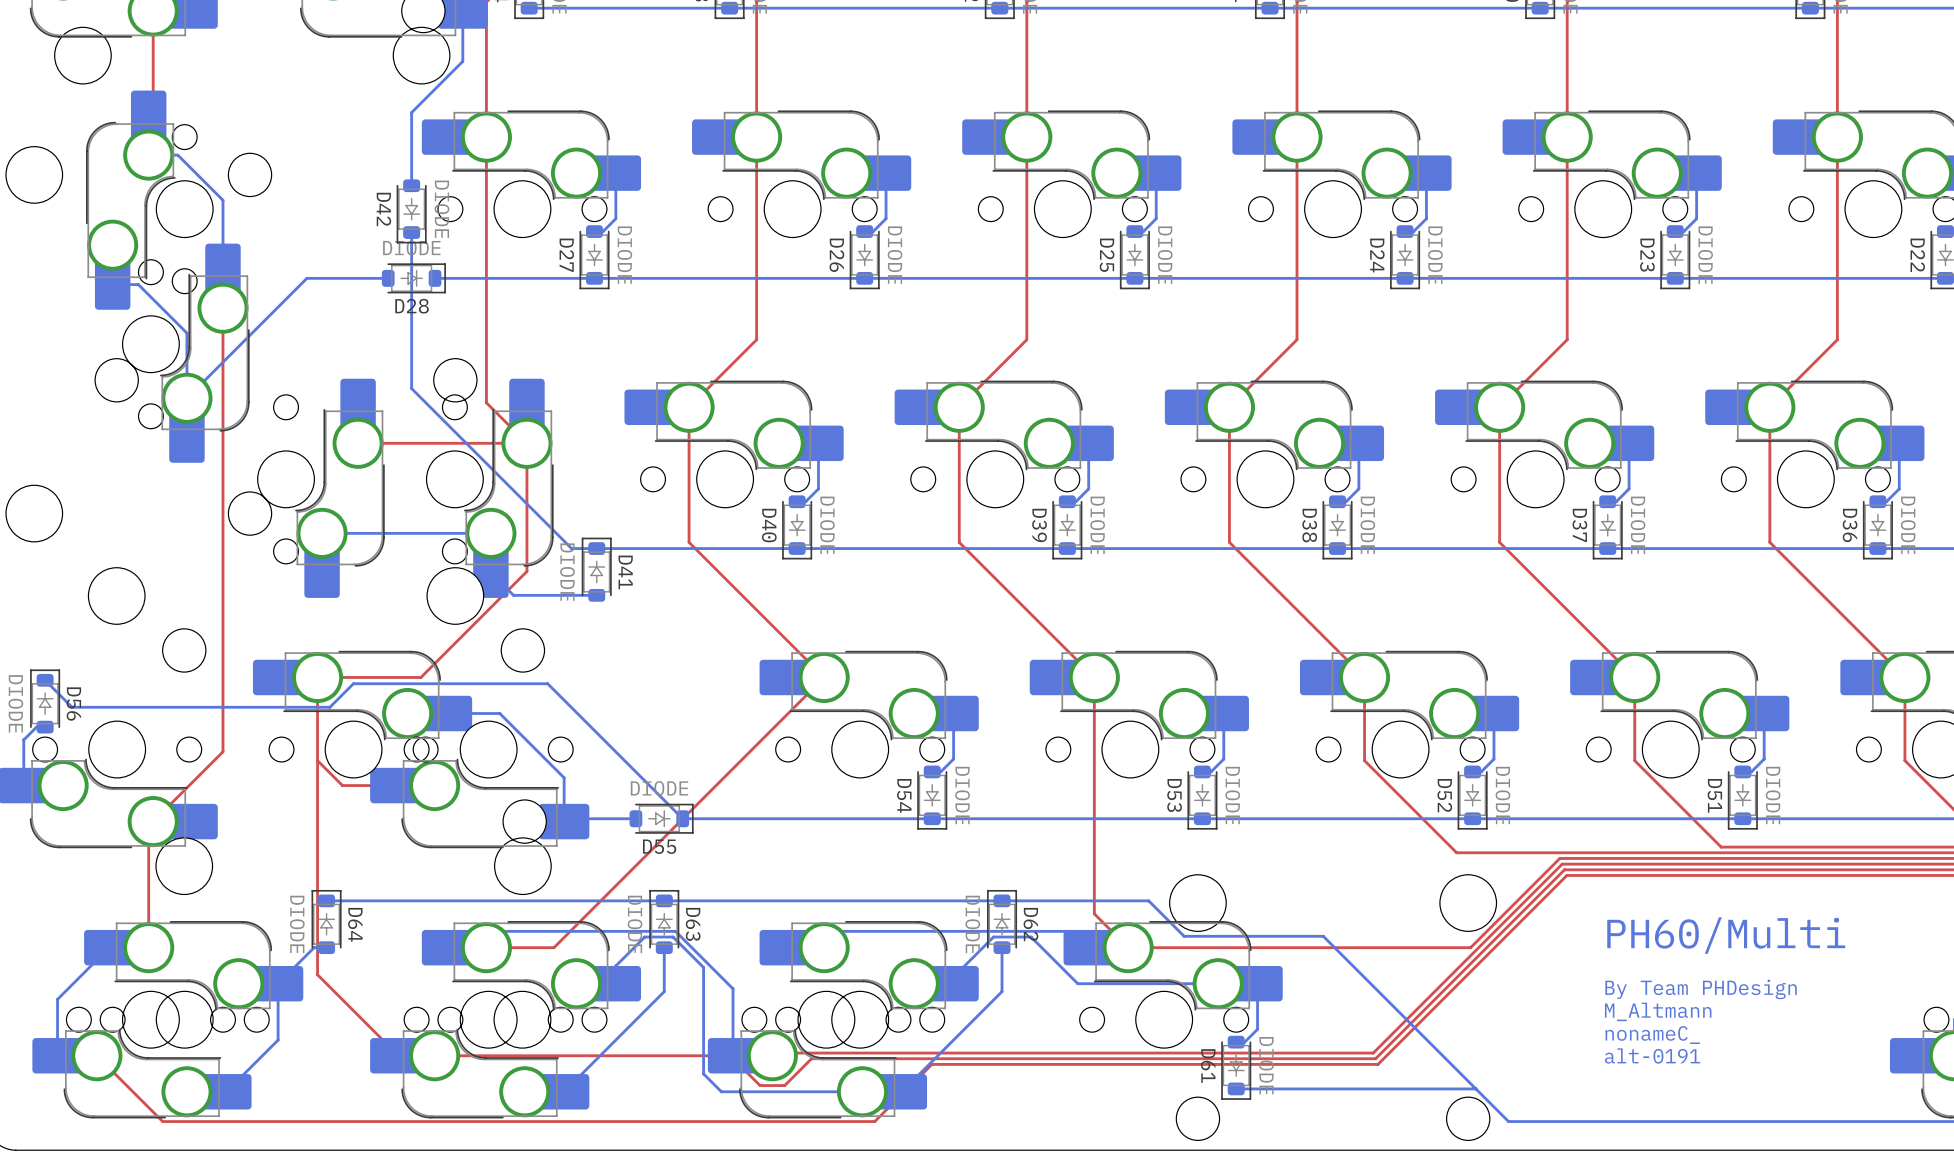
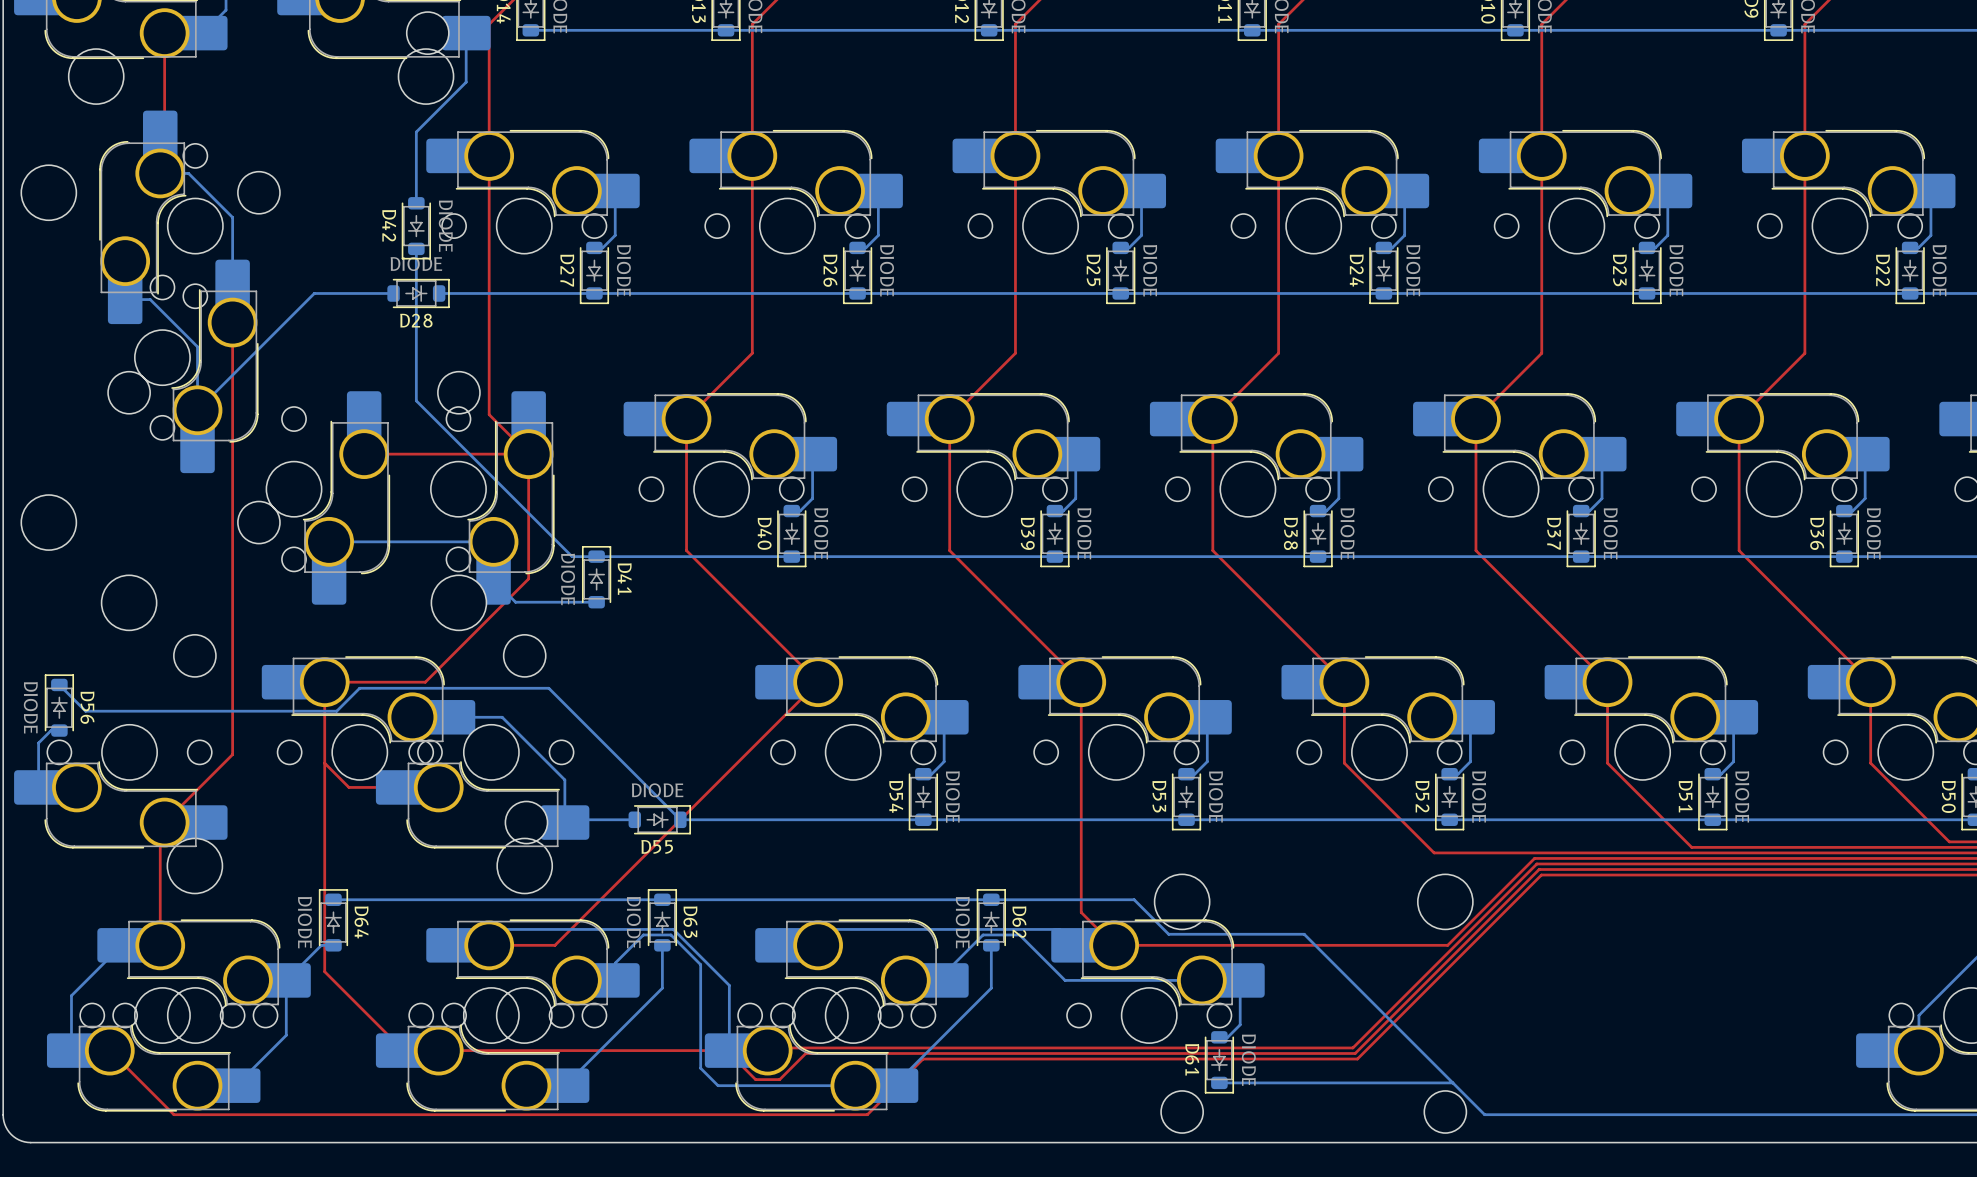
text: PH60/Multi (1726, 935) -> none
text: By Team PHDesign (1701, 989) -> none
text: M_Altmann (1658, 1011) -> none
text: nonameC_ (1652, 1035) -> none
text: alt-0191 (1652, 1055) -> none

